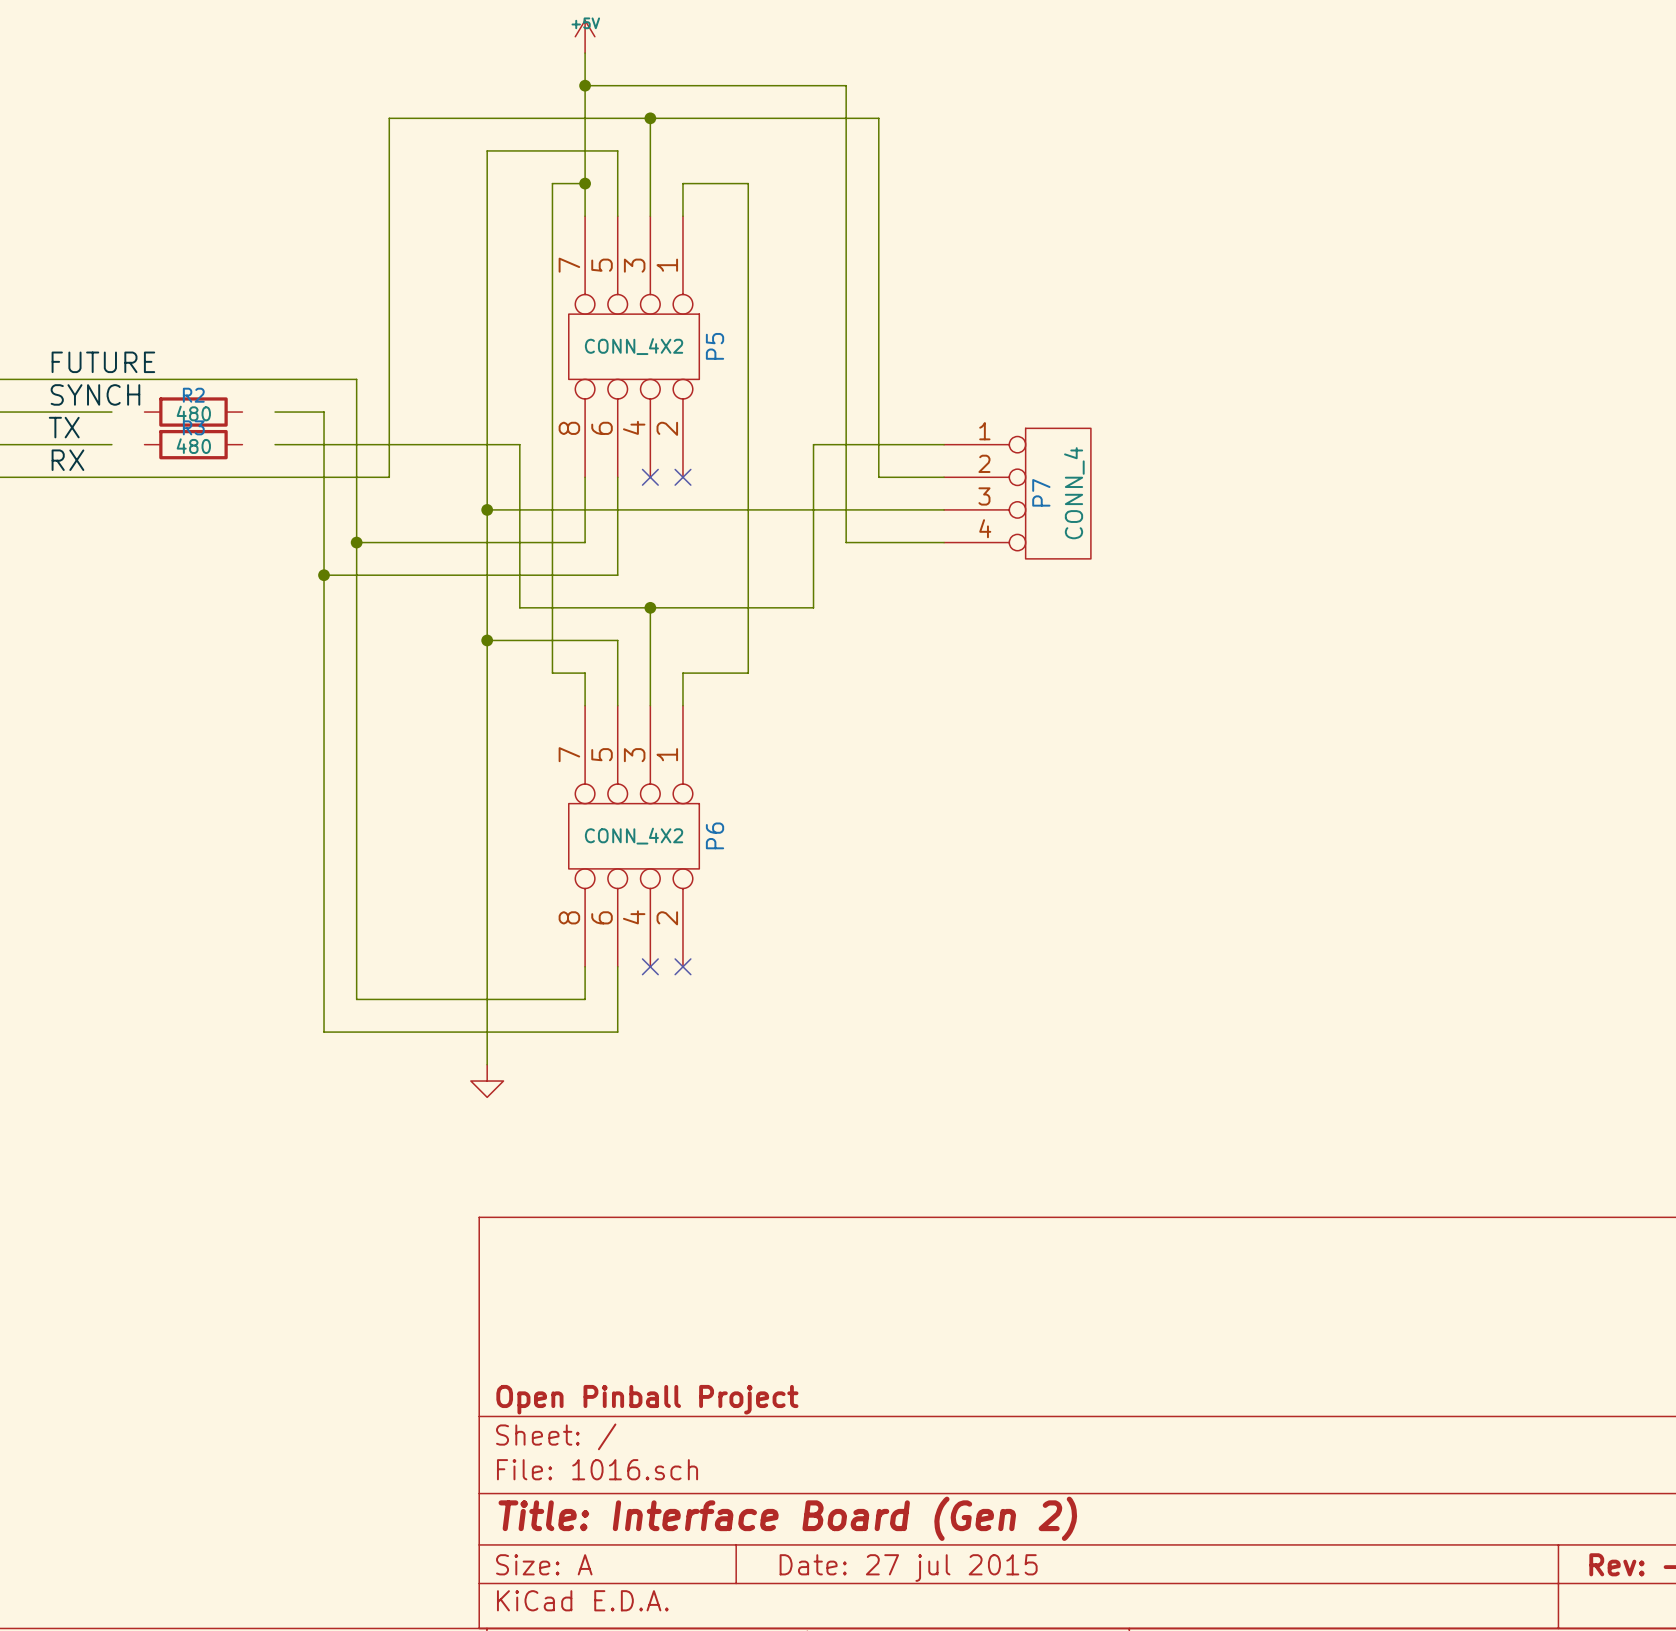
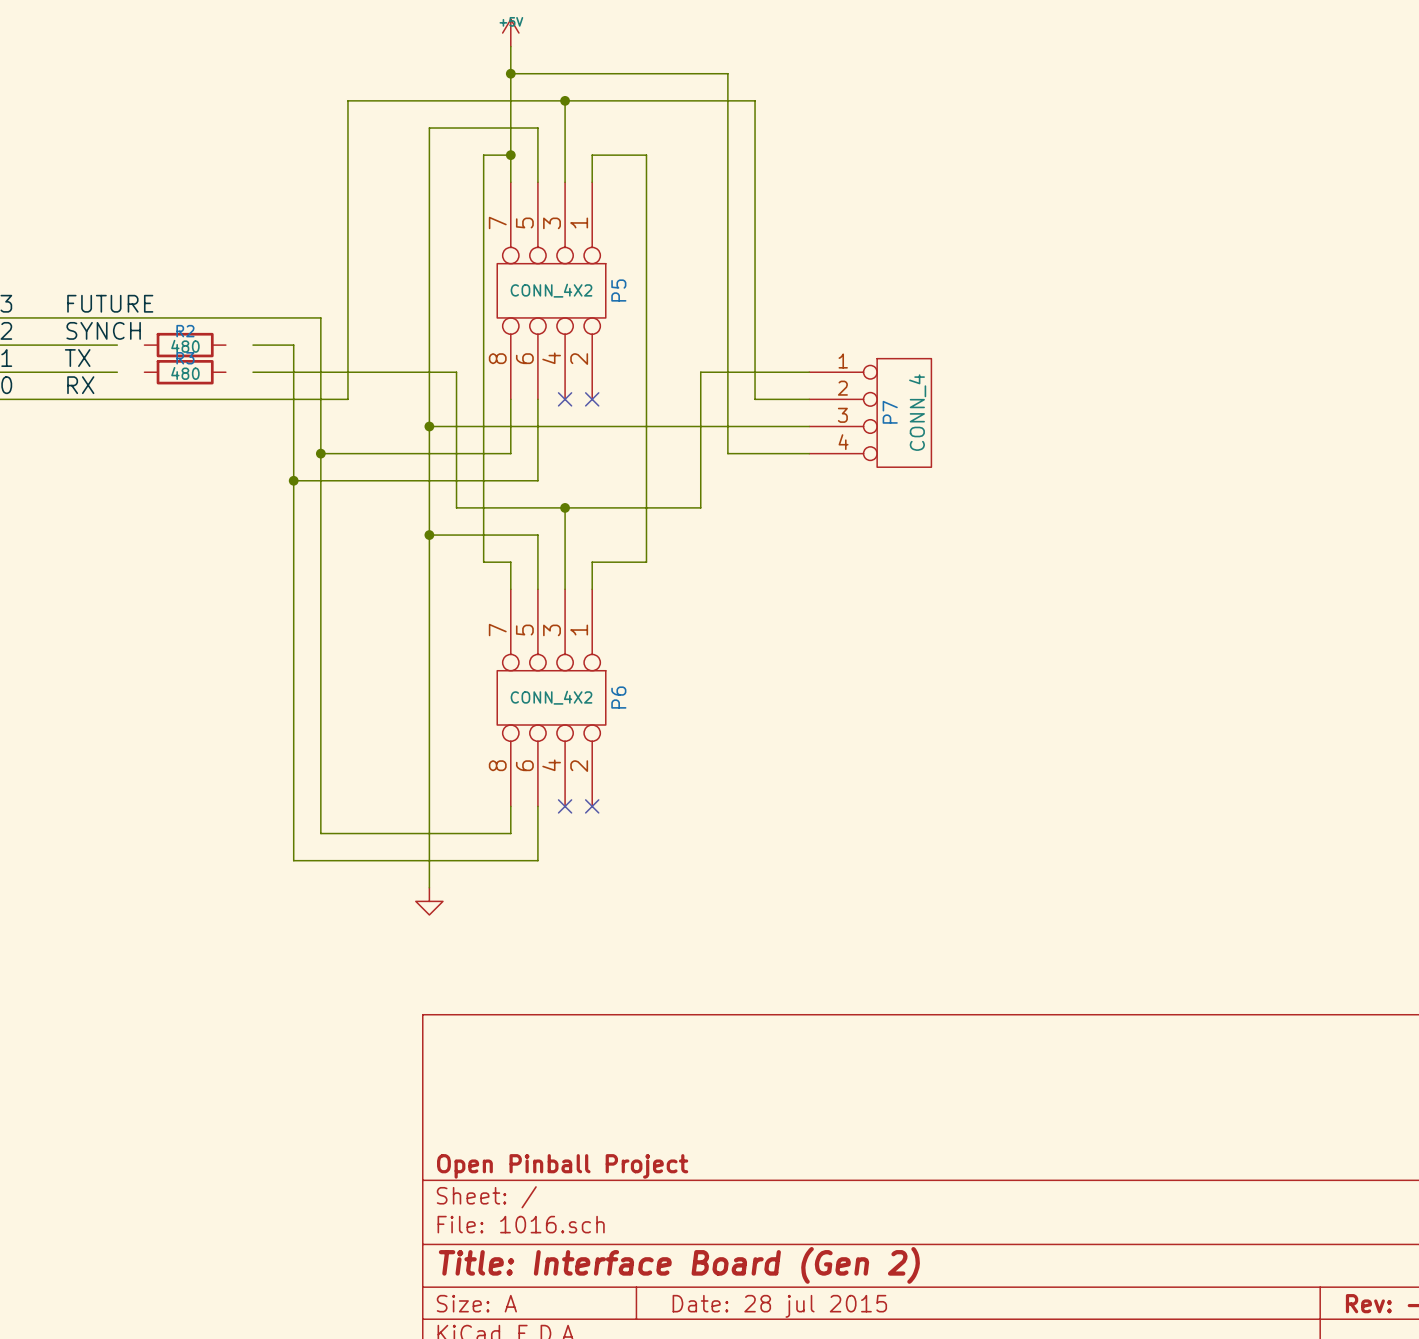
title block: Date: 27 jul 2015 (908, 1568) -> Date: 28 jul 2015 (779, 1306)

